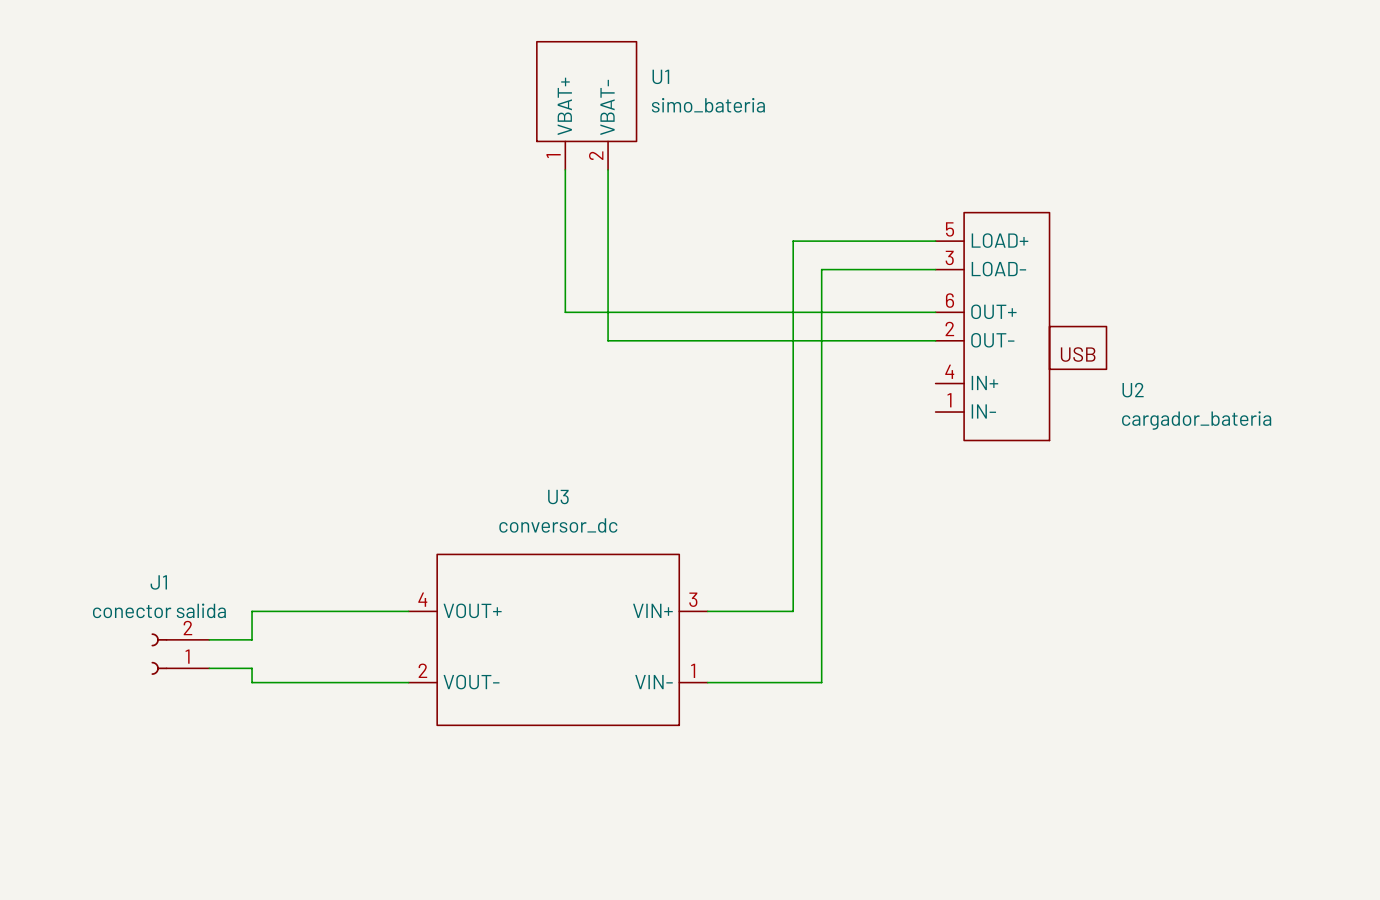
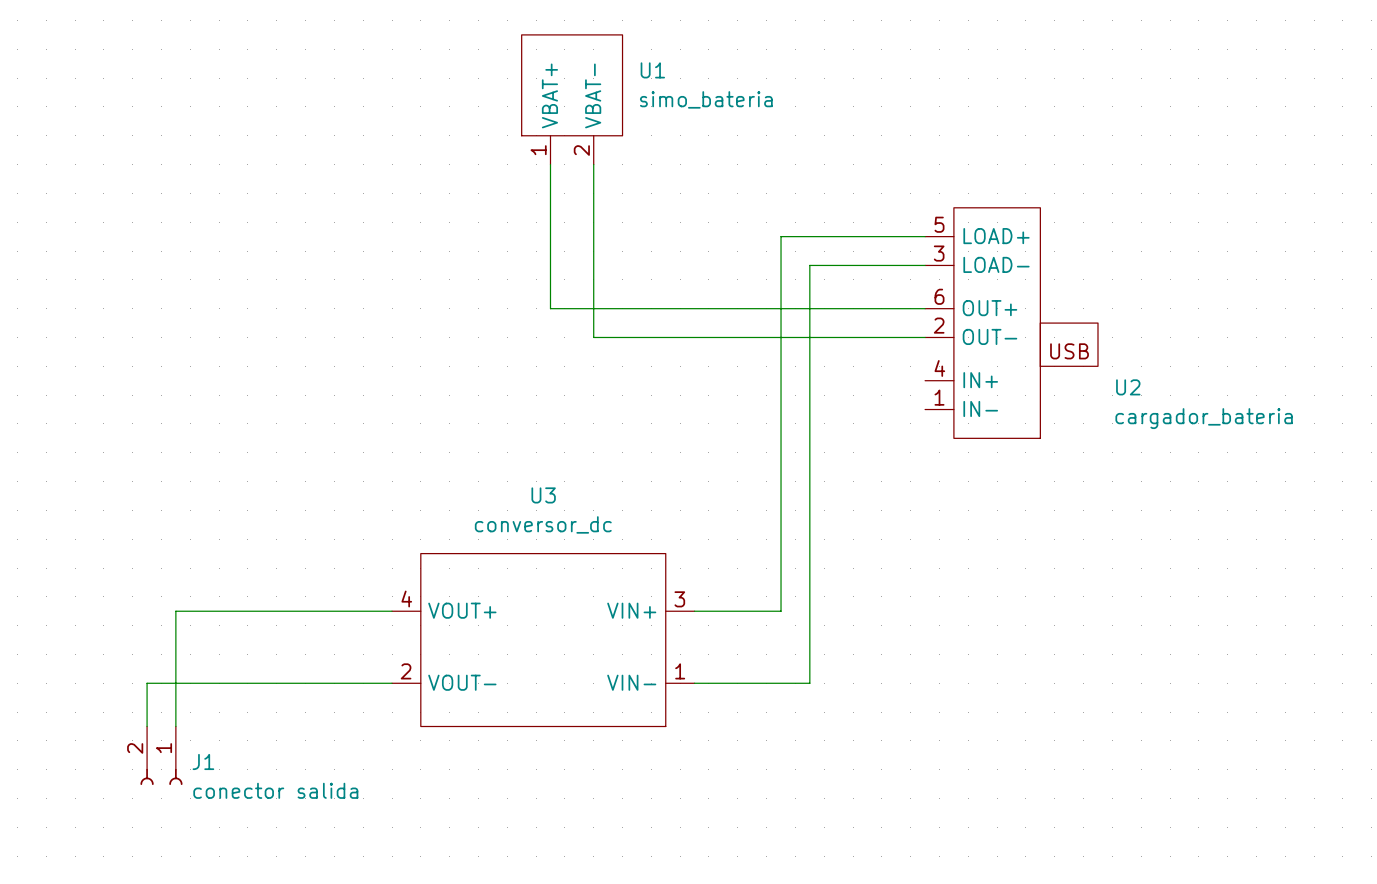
J1 name position: J1 (158, 582) -> J1 (203, 761)
J1 value position: conector salida (159, 610) -> conector salida (275, 790)
wire: (252, 611) (252, 639) (209, 639) -> (233, 611) (175, 611) (175, 726)
J1 rotation: 0° (159, 654) -> 90° counterclockwise (161, 776)
J1 position: (180, 654) -> (161, 755)
wire: (209, 668) (252, 668) (252, 682) -> (147, 726) (147, 683) (233, 683)

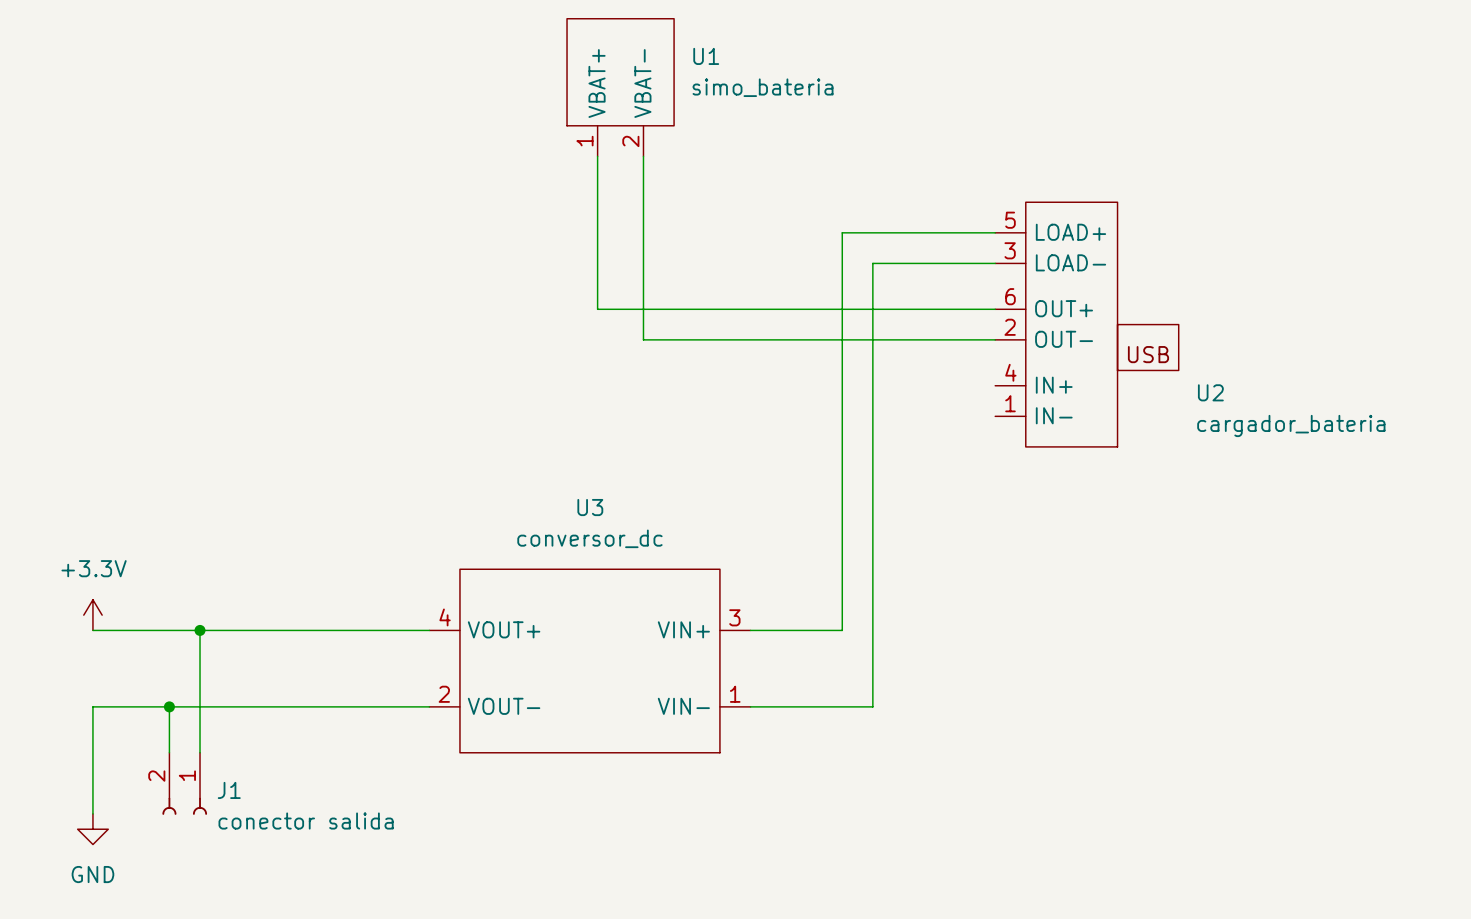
power symbol: none -> +3.3V (92, 615)
wire: none -> (92, 630) (200, 630)
junction: none -> (200, 630)
wire: none -> (169, 706) (92, 706) (92, 813)
junction: none -> (169, 706)
power symbol: none -> GND (92, 829)

